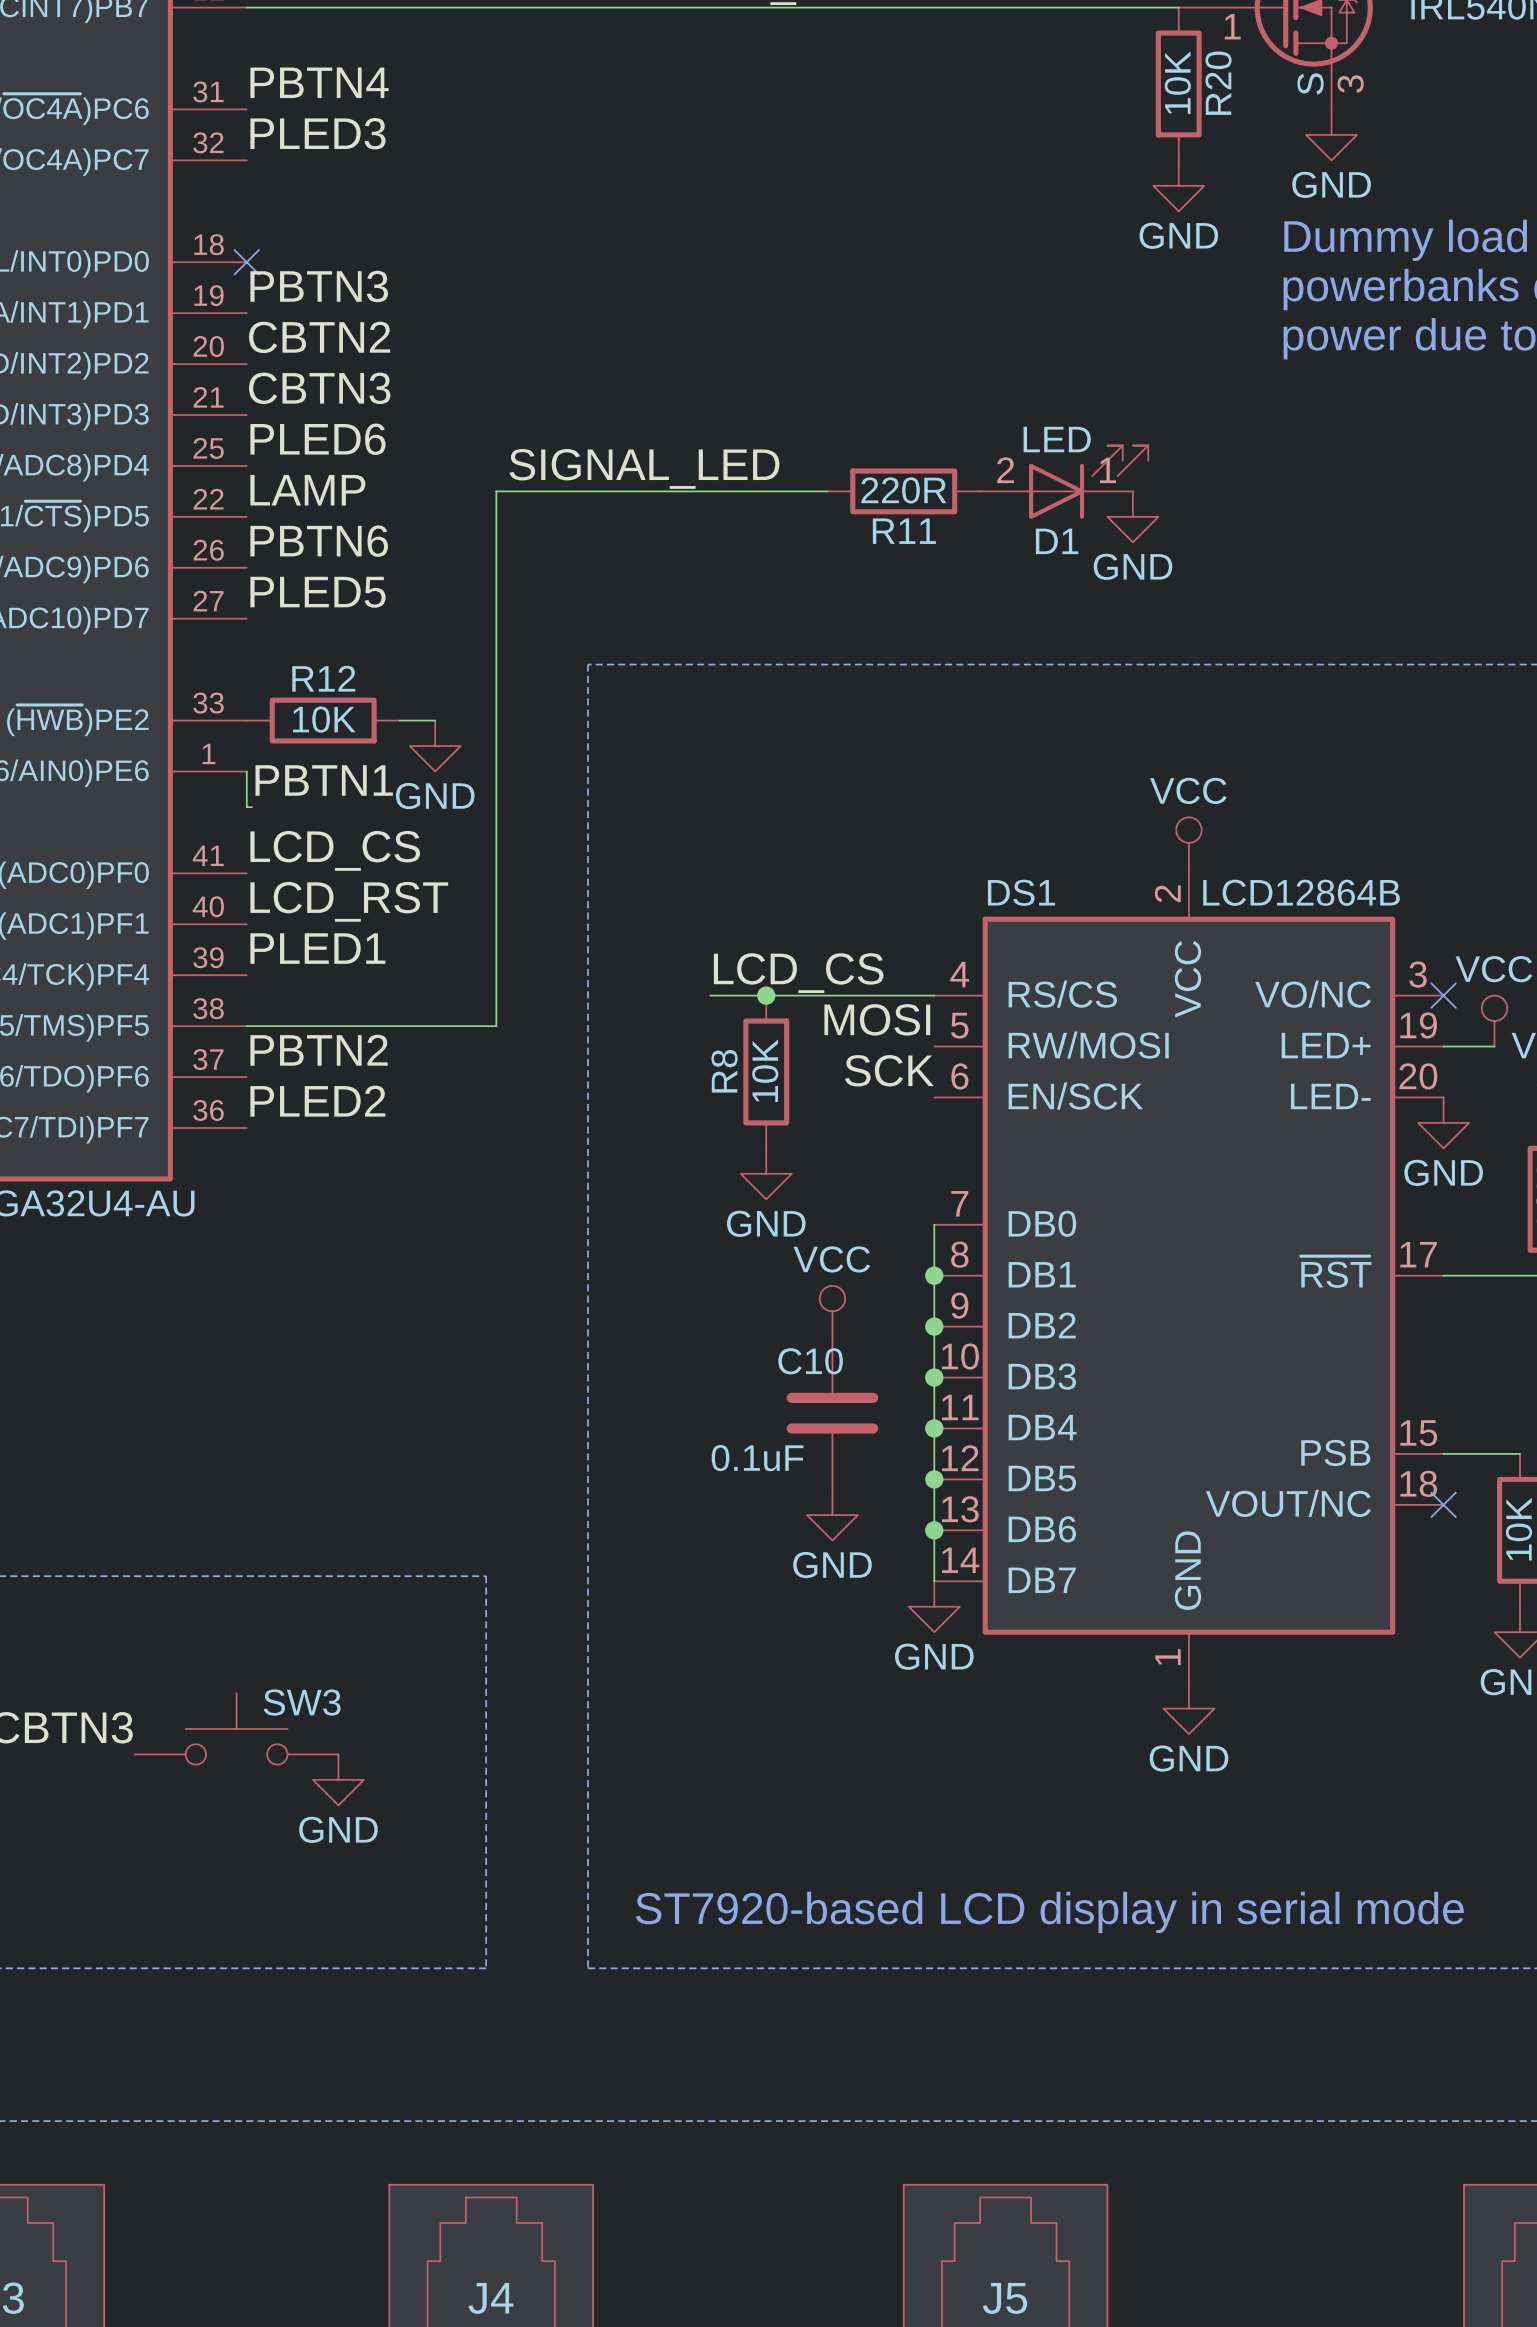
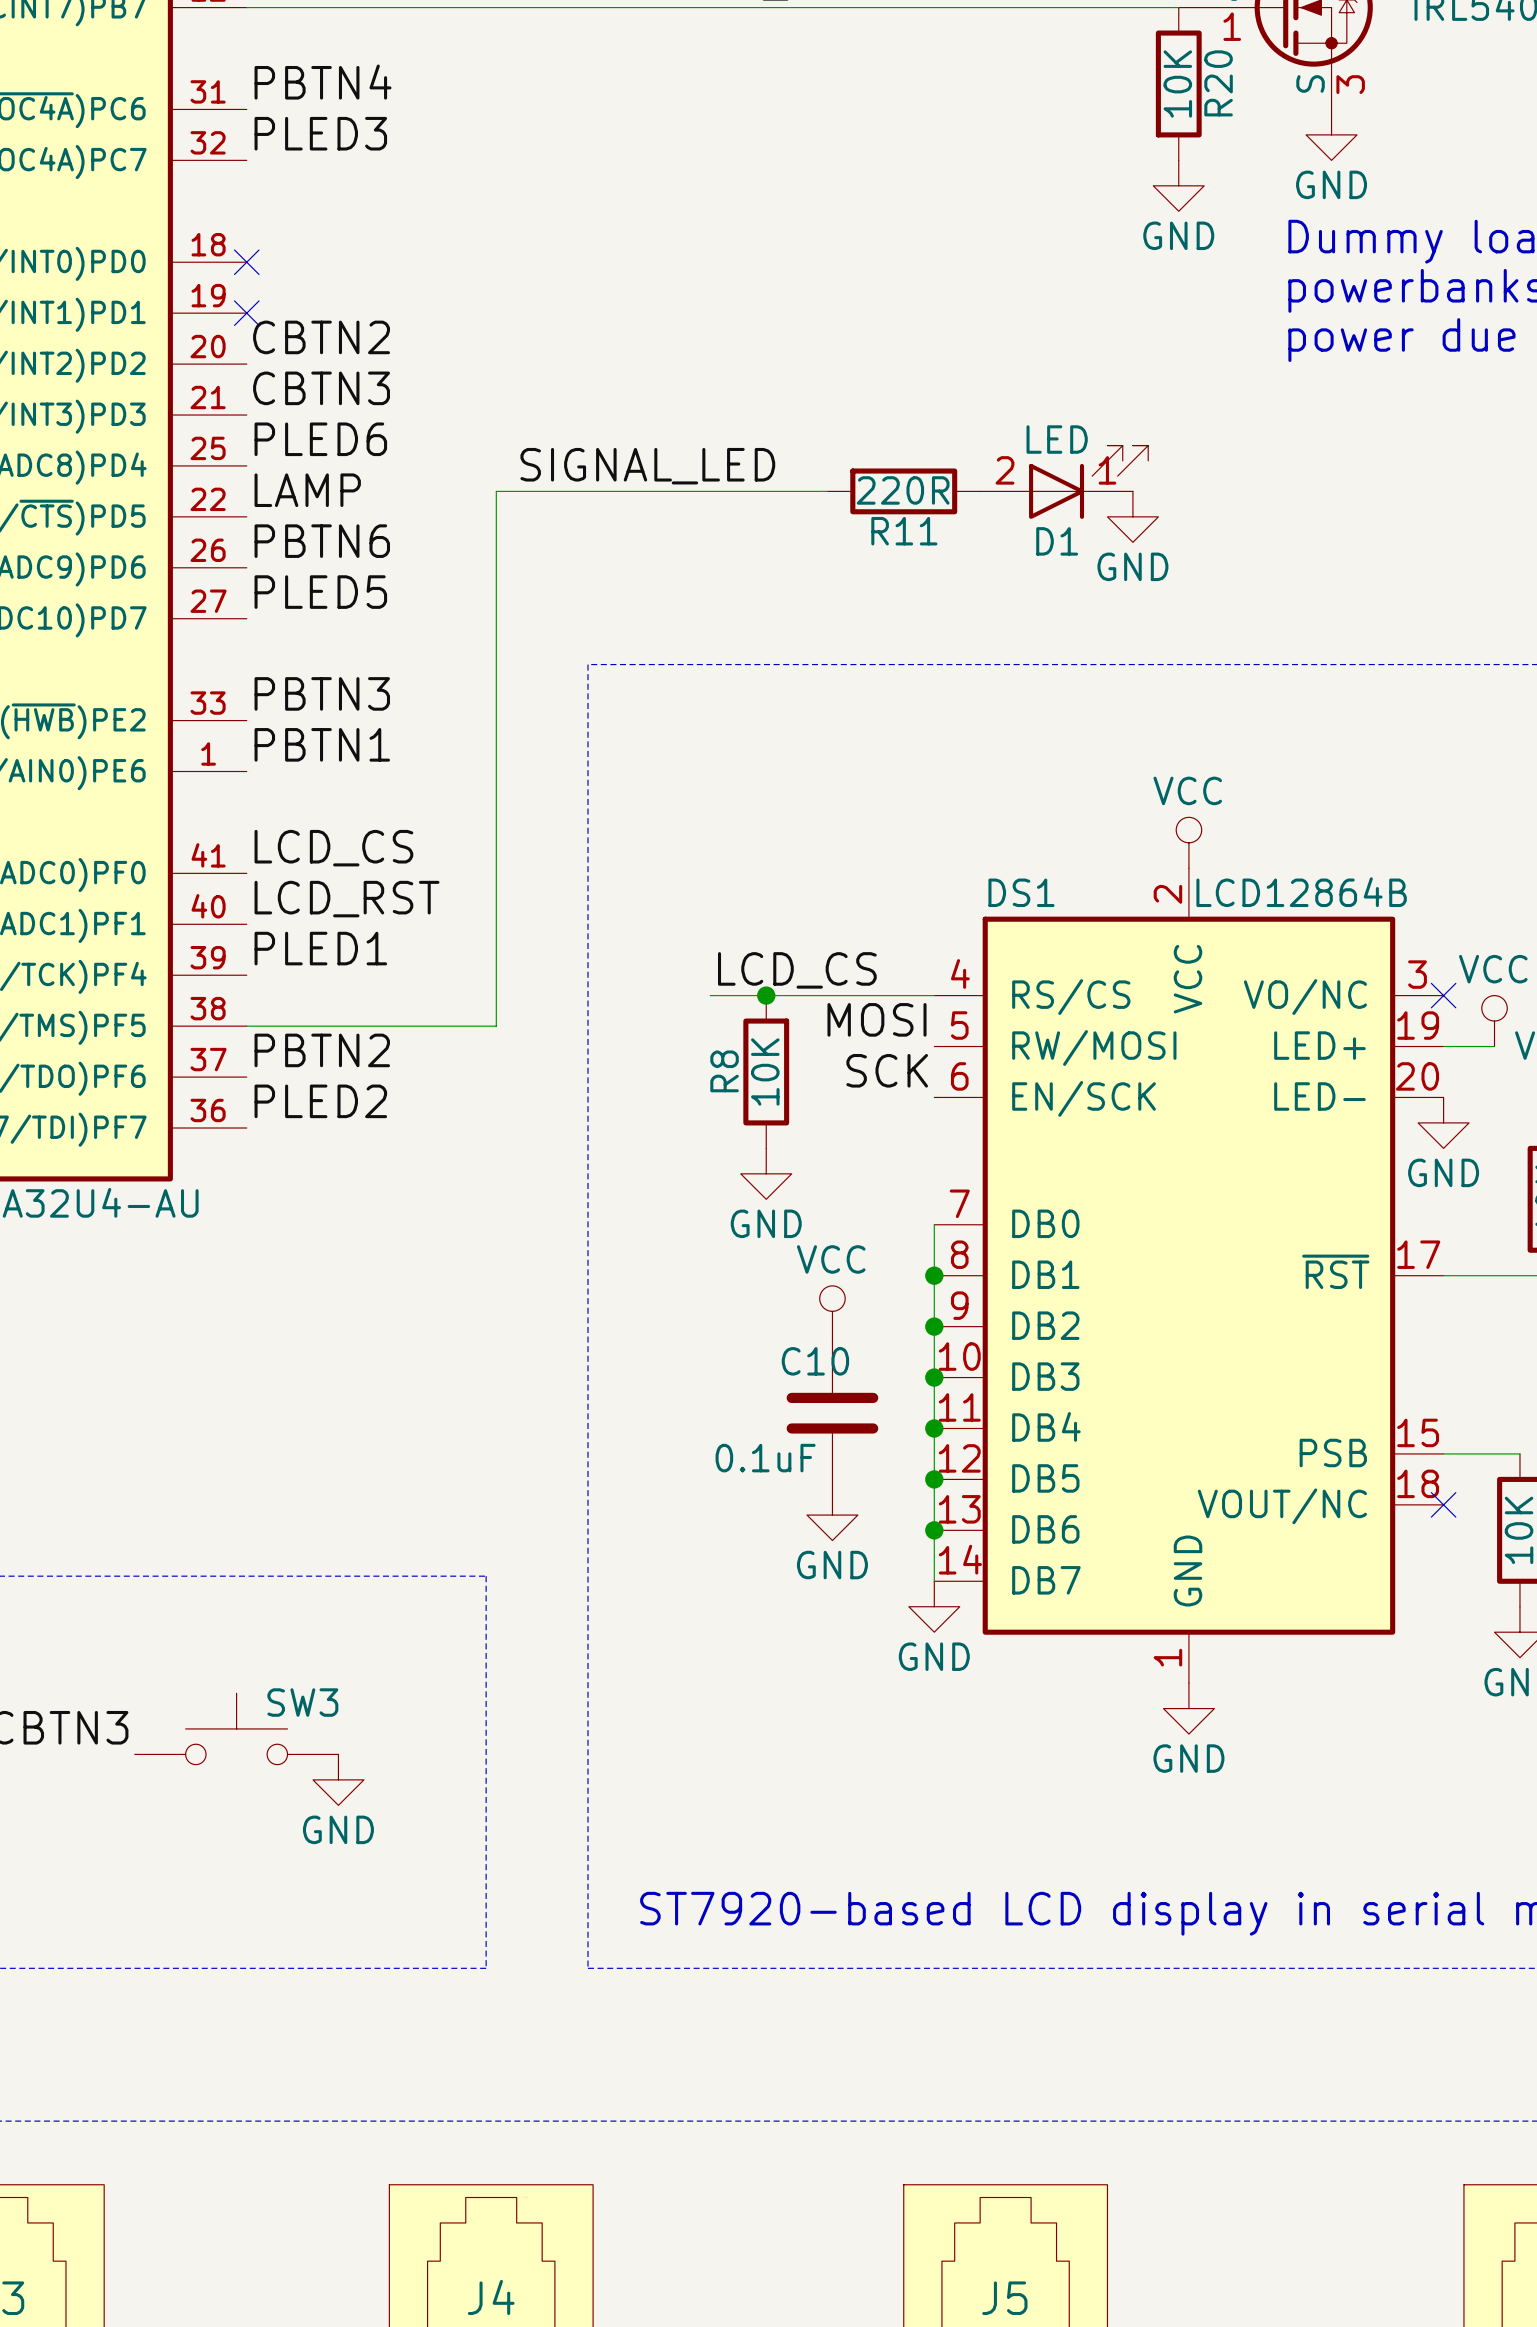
label position: PBTN3 (319, 286) -> PBTN3 (322, 693)
no-connect mark: none -> (246, 313)
R12: 10K (323, 720) -> none
wire: (399, 720) (435, 720) -> none
power symbol: GND (435, 746) -> none
wire: (246, 771) (246, 807) (251, 807) -> none
label position: PBTN1 (324, 780) -> PBTN1 (322, 744)

